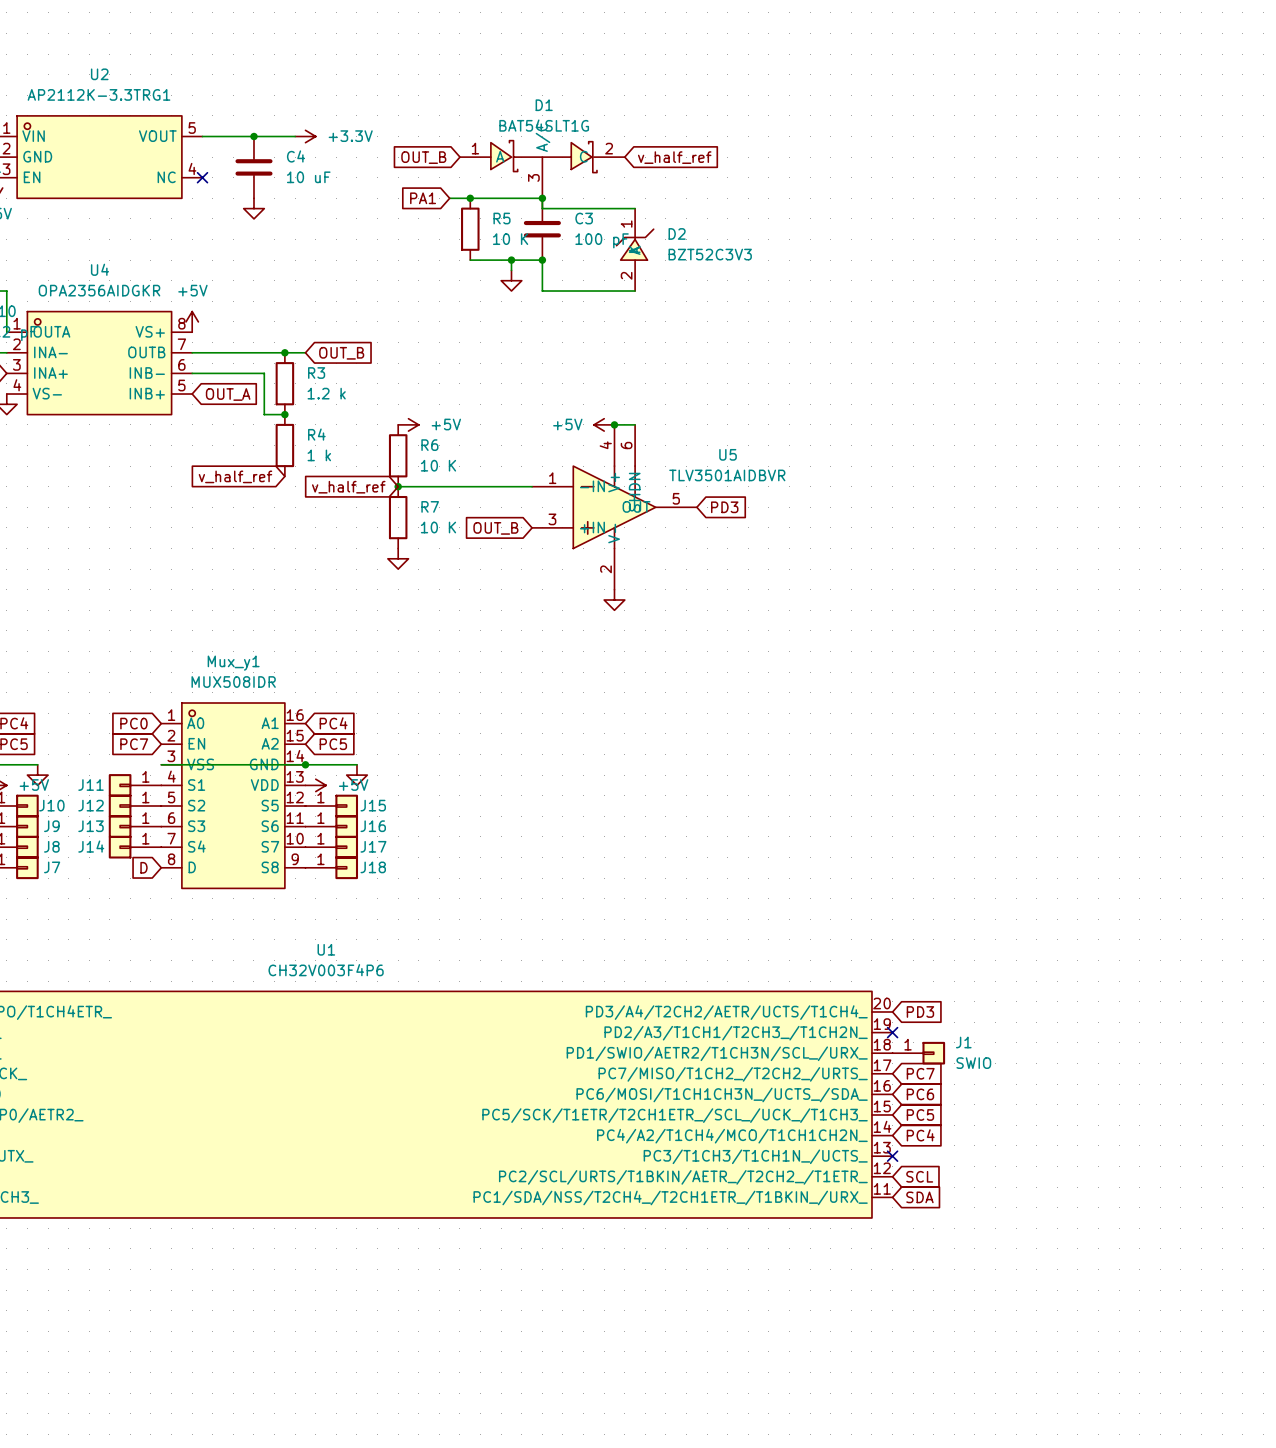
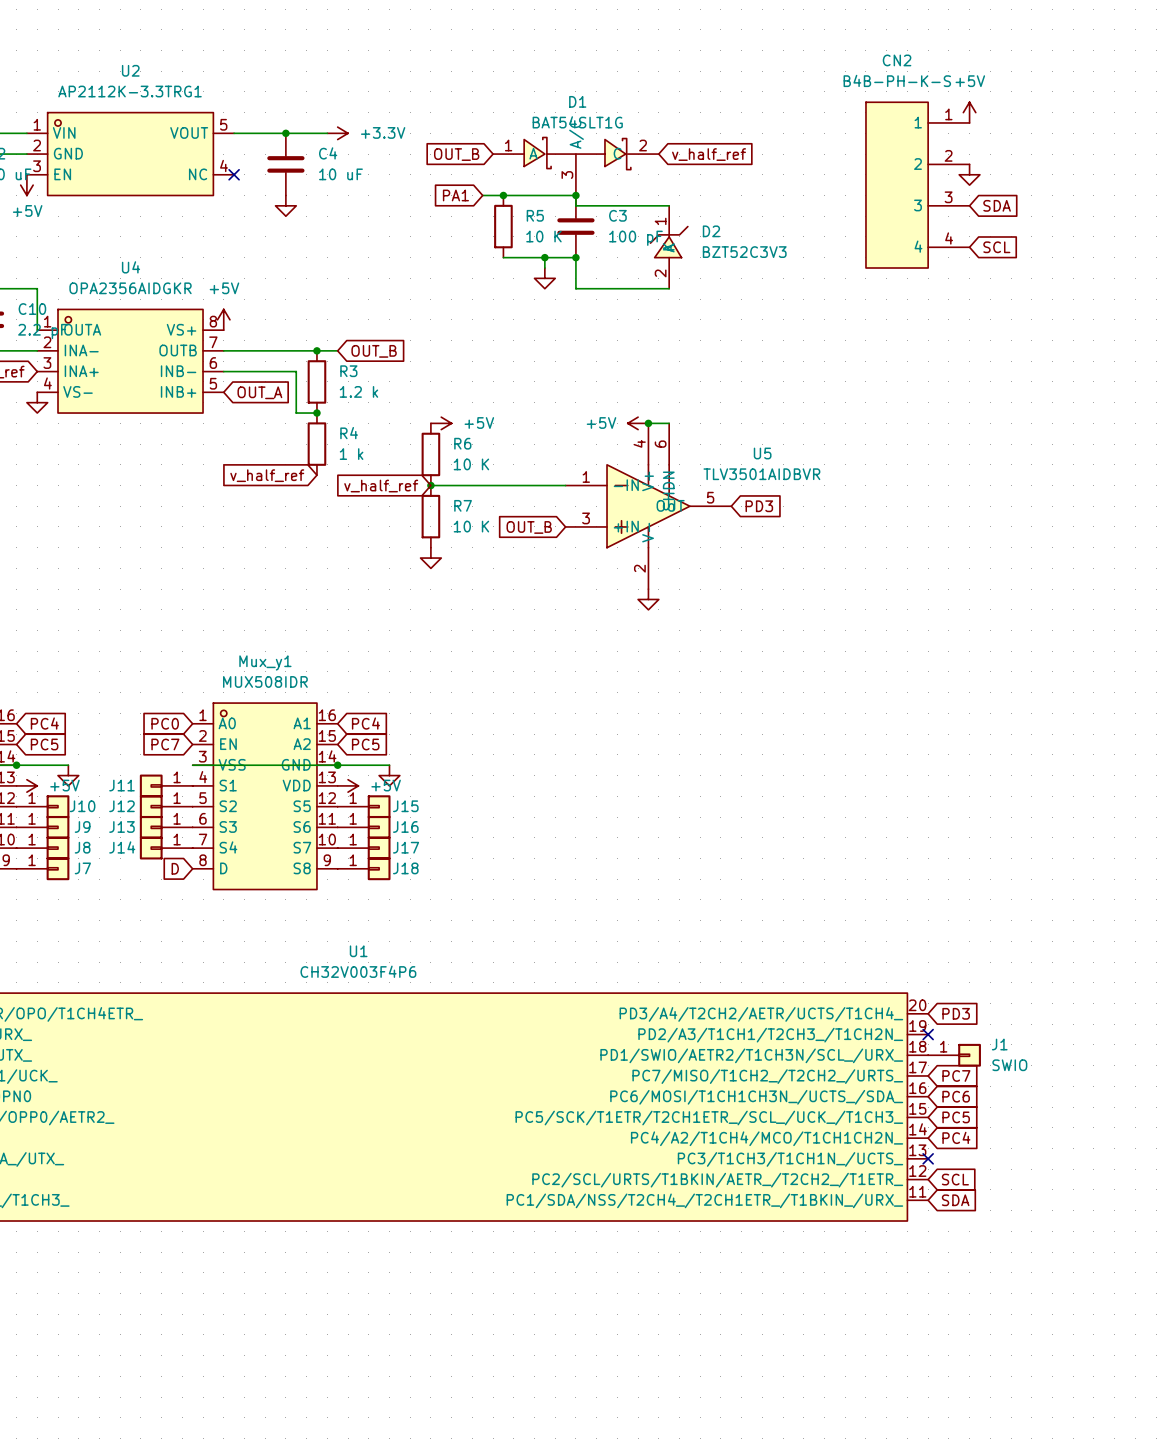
power symbol: none -> +5V (969, 112)
power symbol: none -> (969, 174)
CN2: none -> B4B-PH-K-S (917, 185)
global label: none -> SDA (997, 205)
global label: none -> SCL (996, 247)

